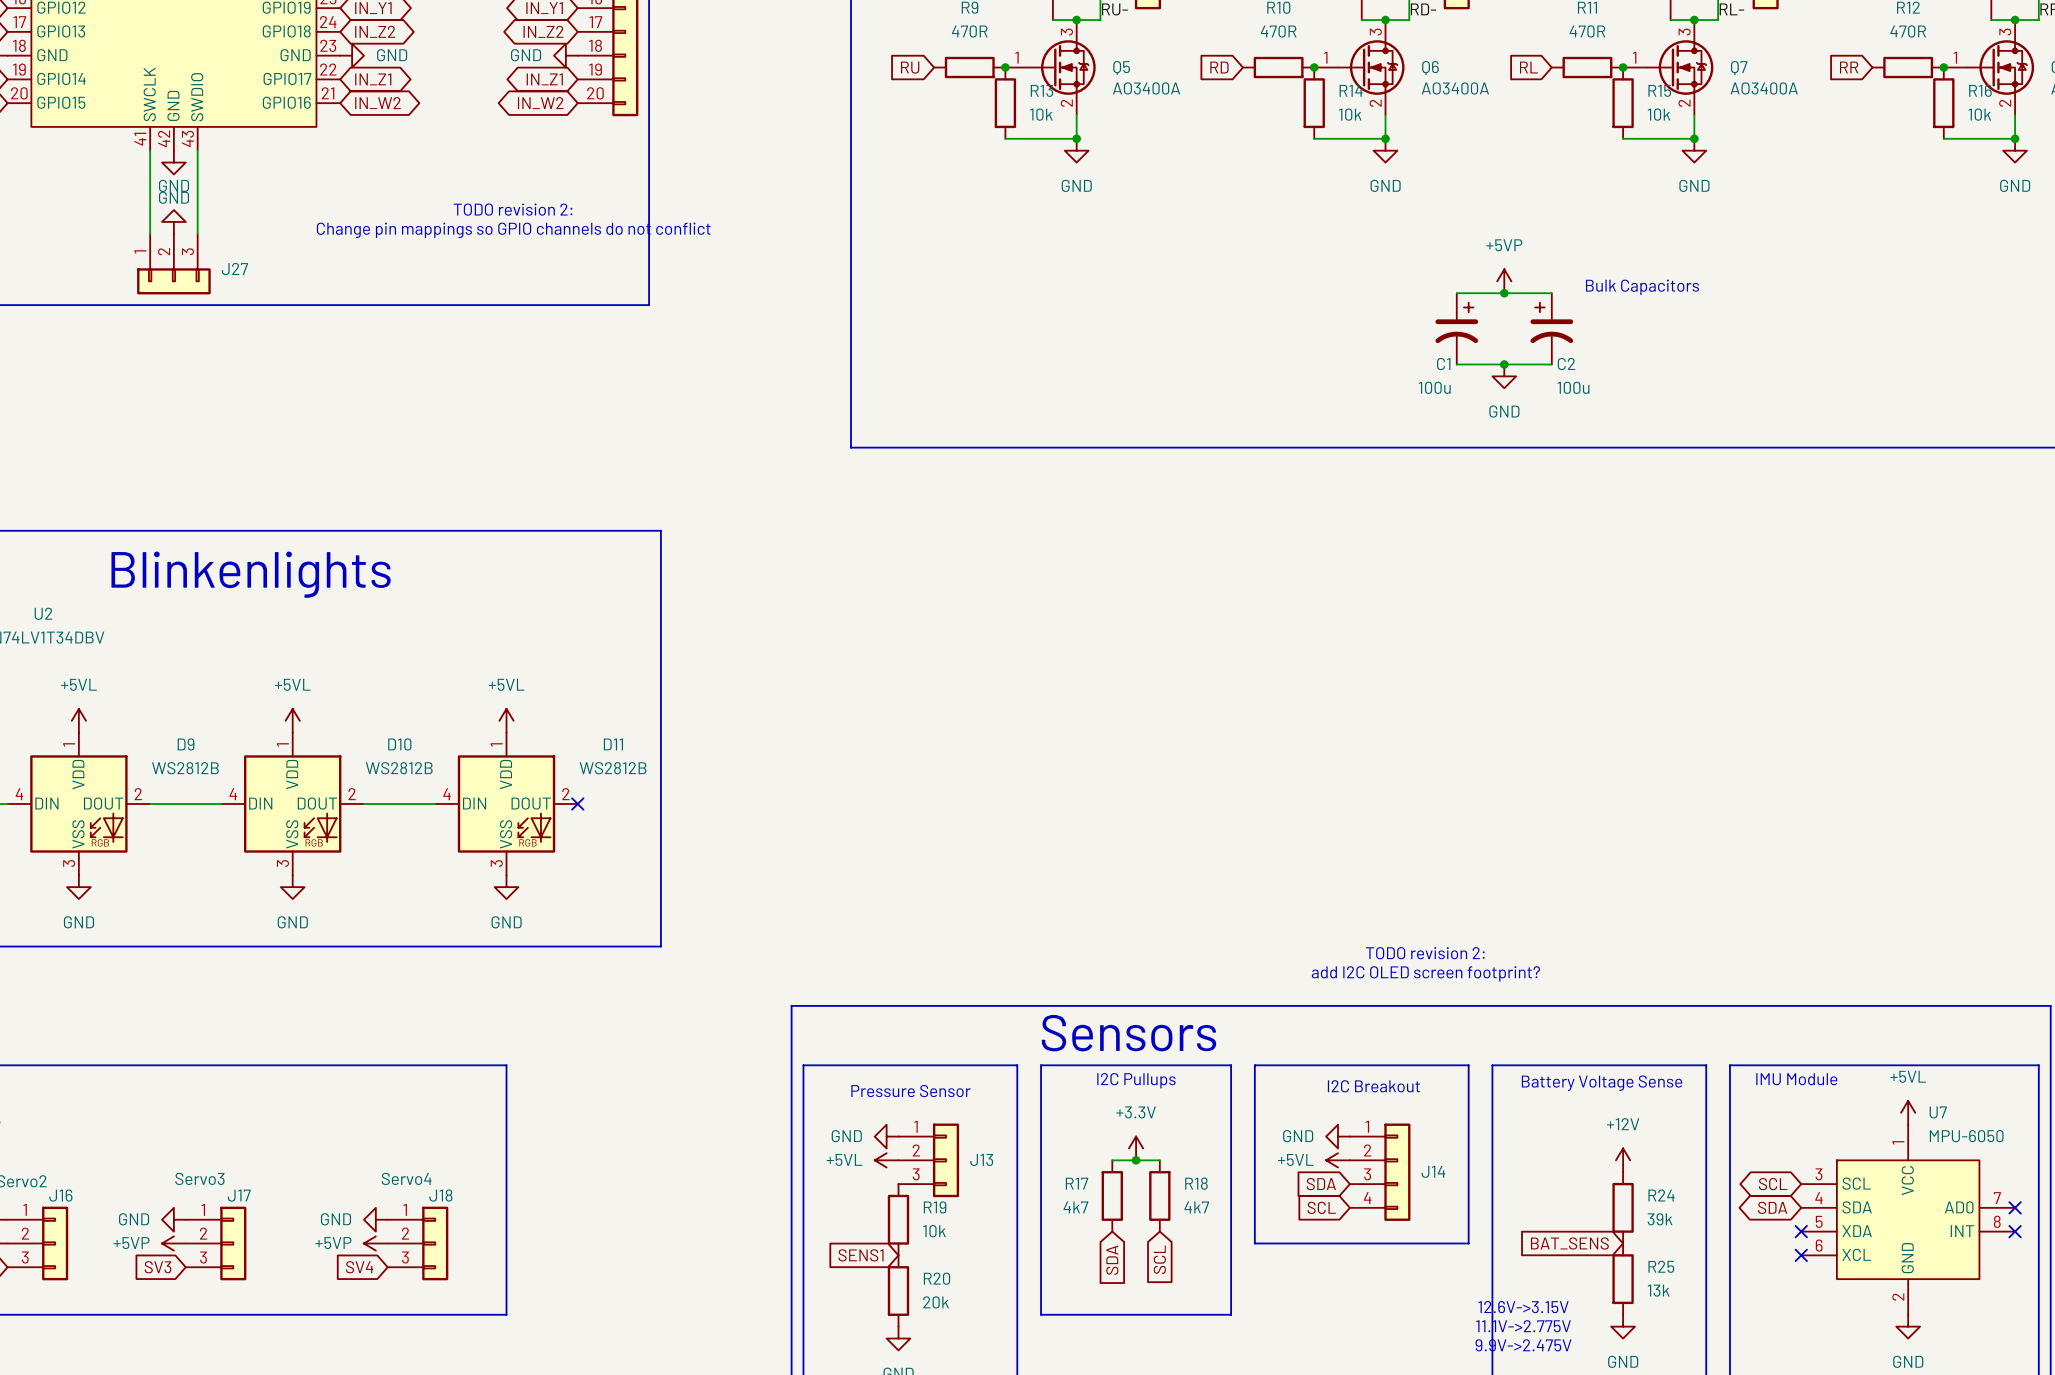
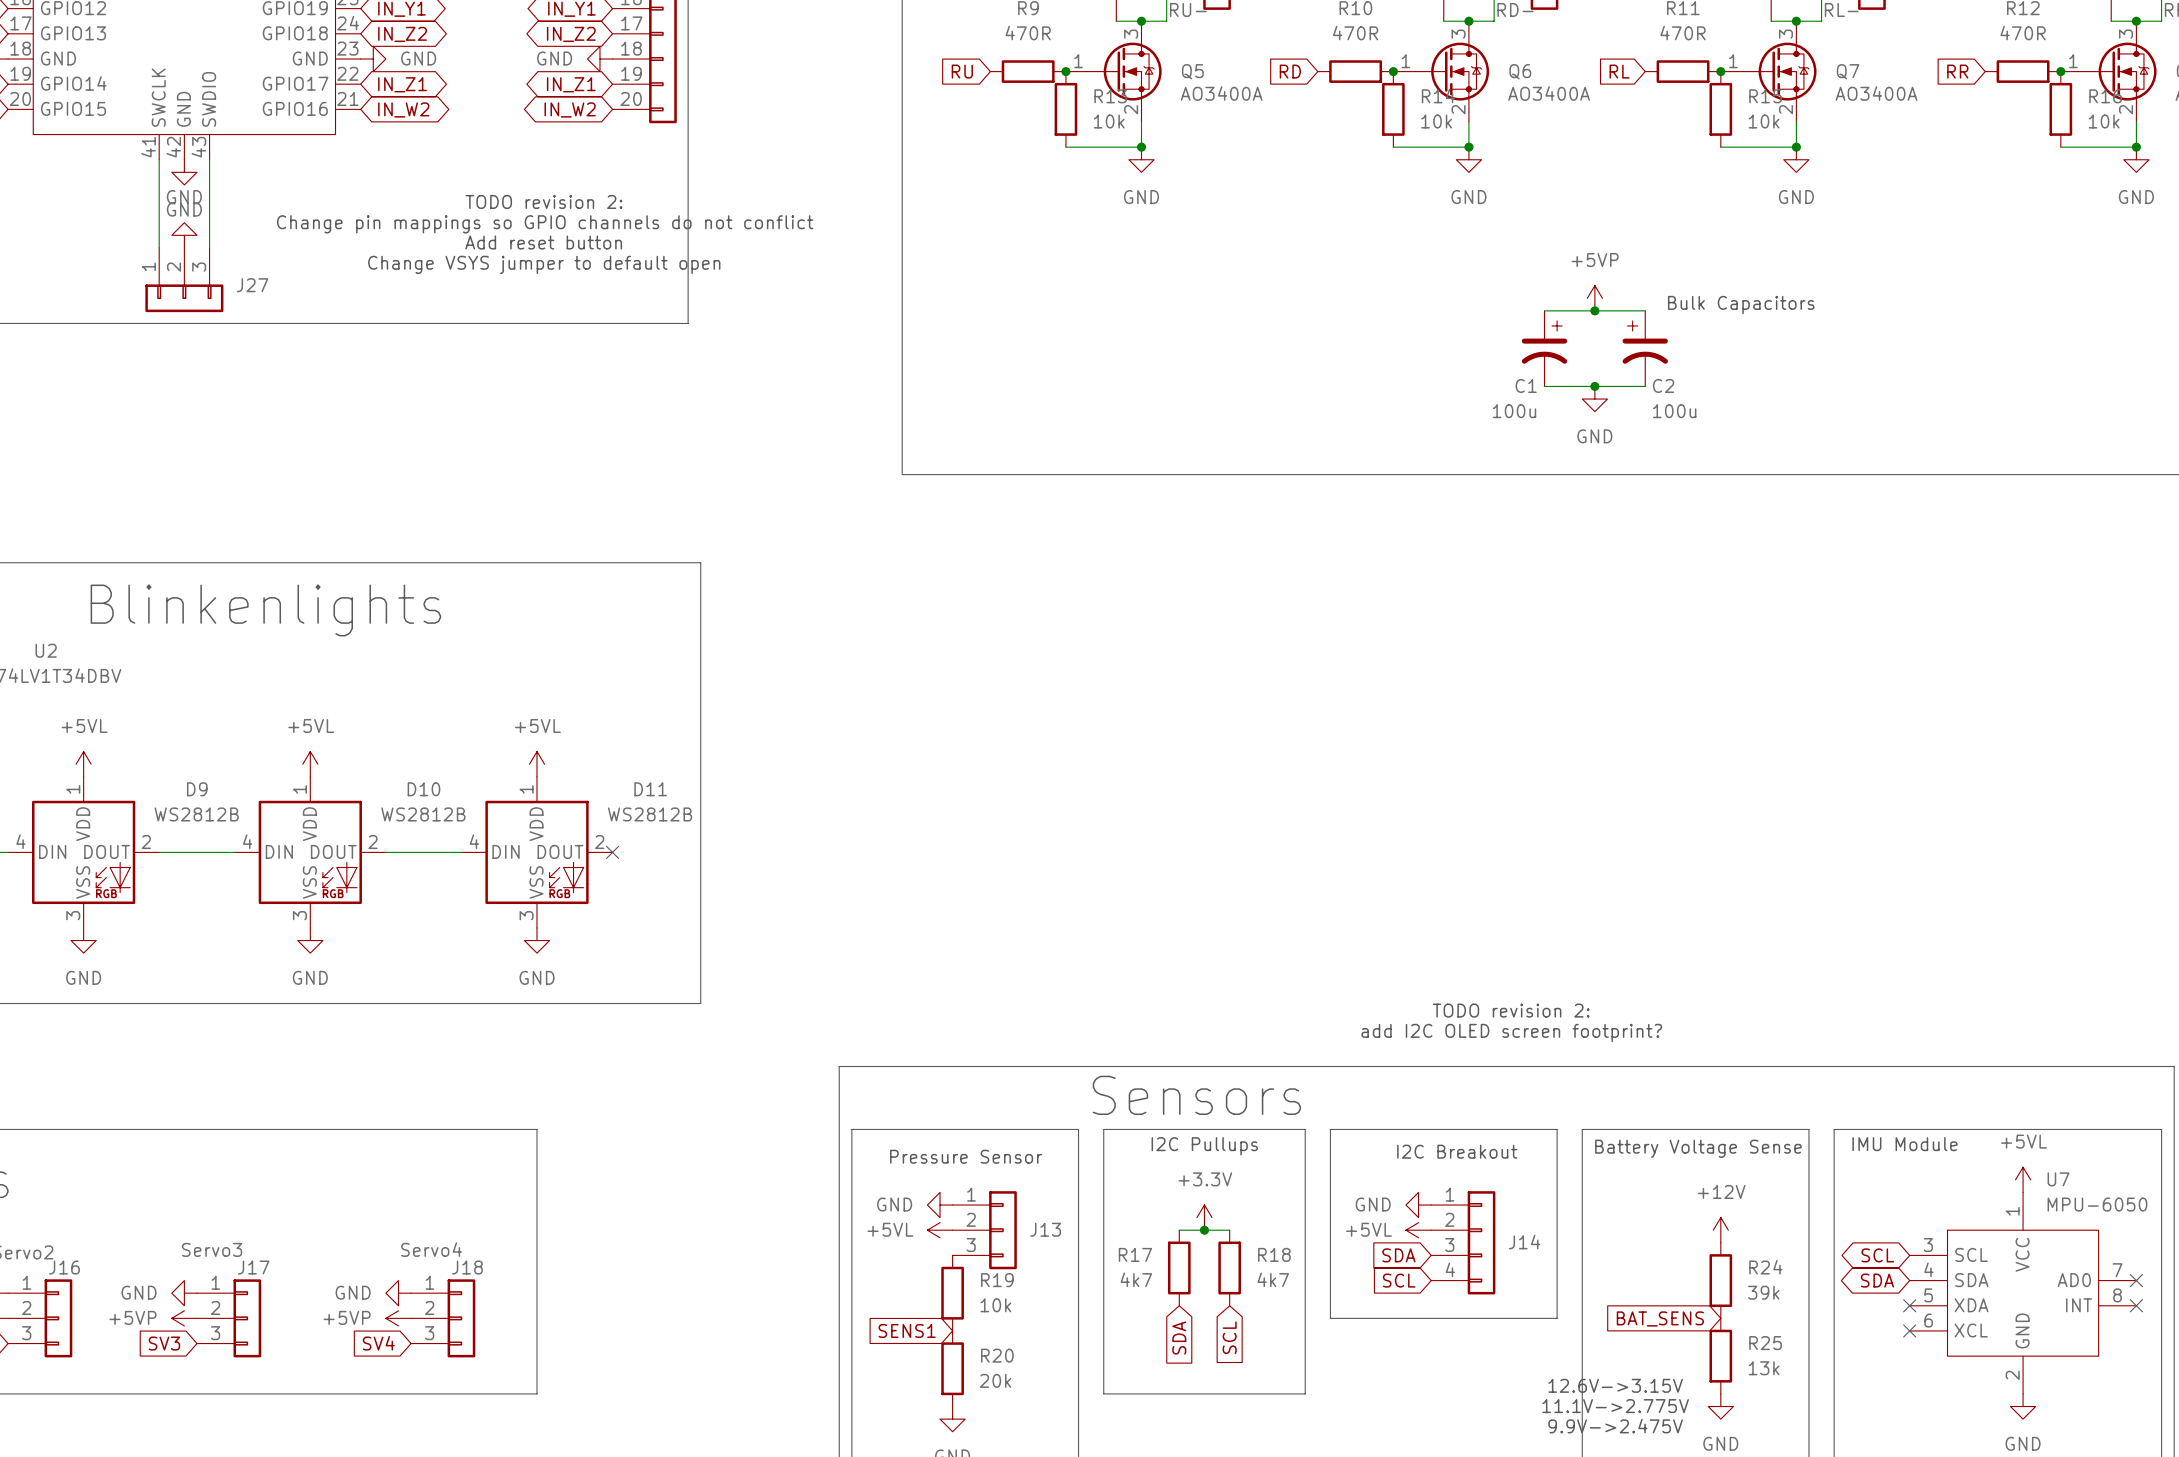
text: none -> TODO revision 2: (543, 201)
text: TODO revision 2: (513, 209) -> Change pin mappings so GPIO channels do not conflict (545, 224)
text: Change pin mappings so GPIO channels do not conflict (513, 230) -> Add reset button (543, 242)
text: none -> Change VSYS jumper to default open (544, 264)

